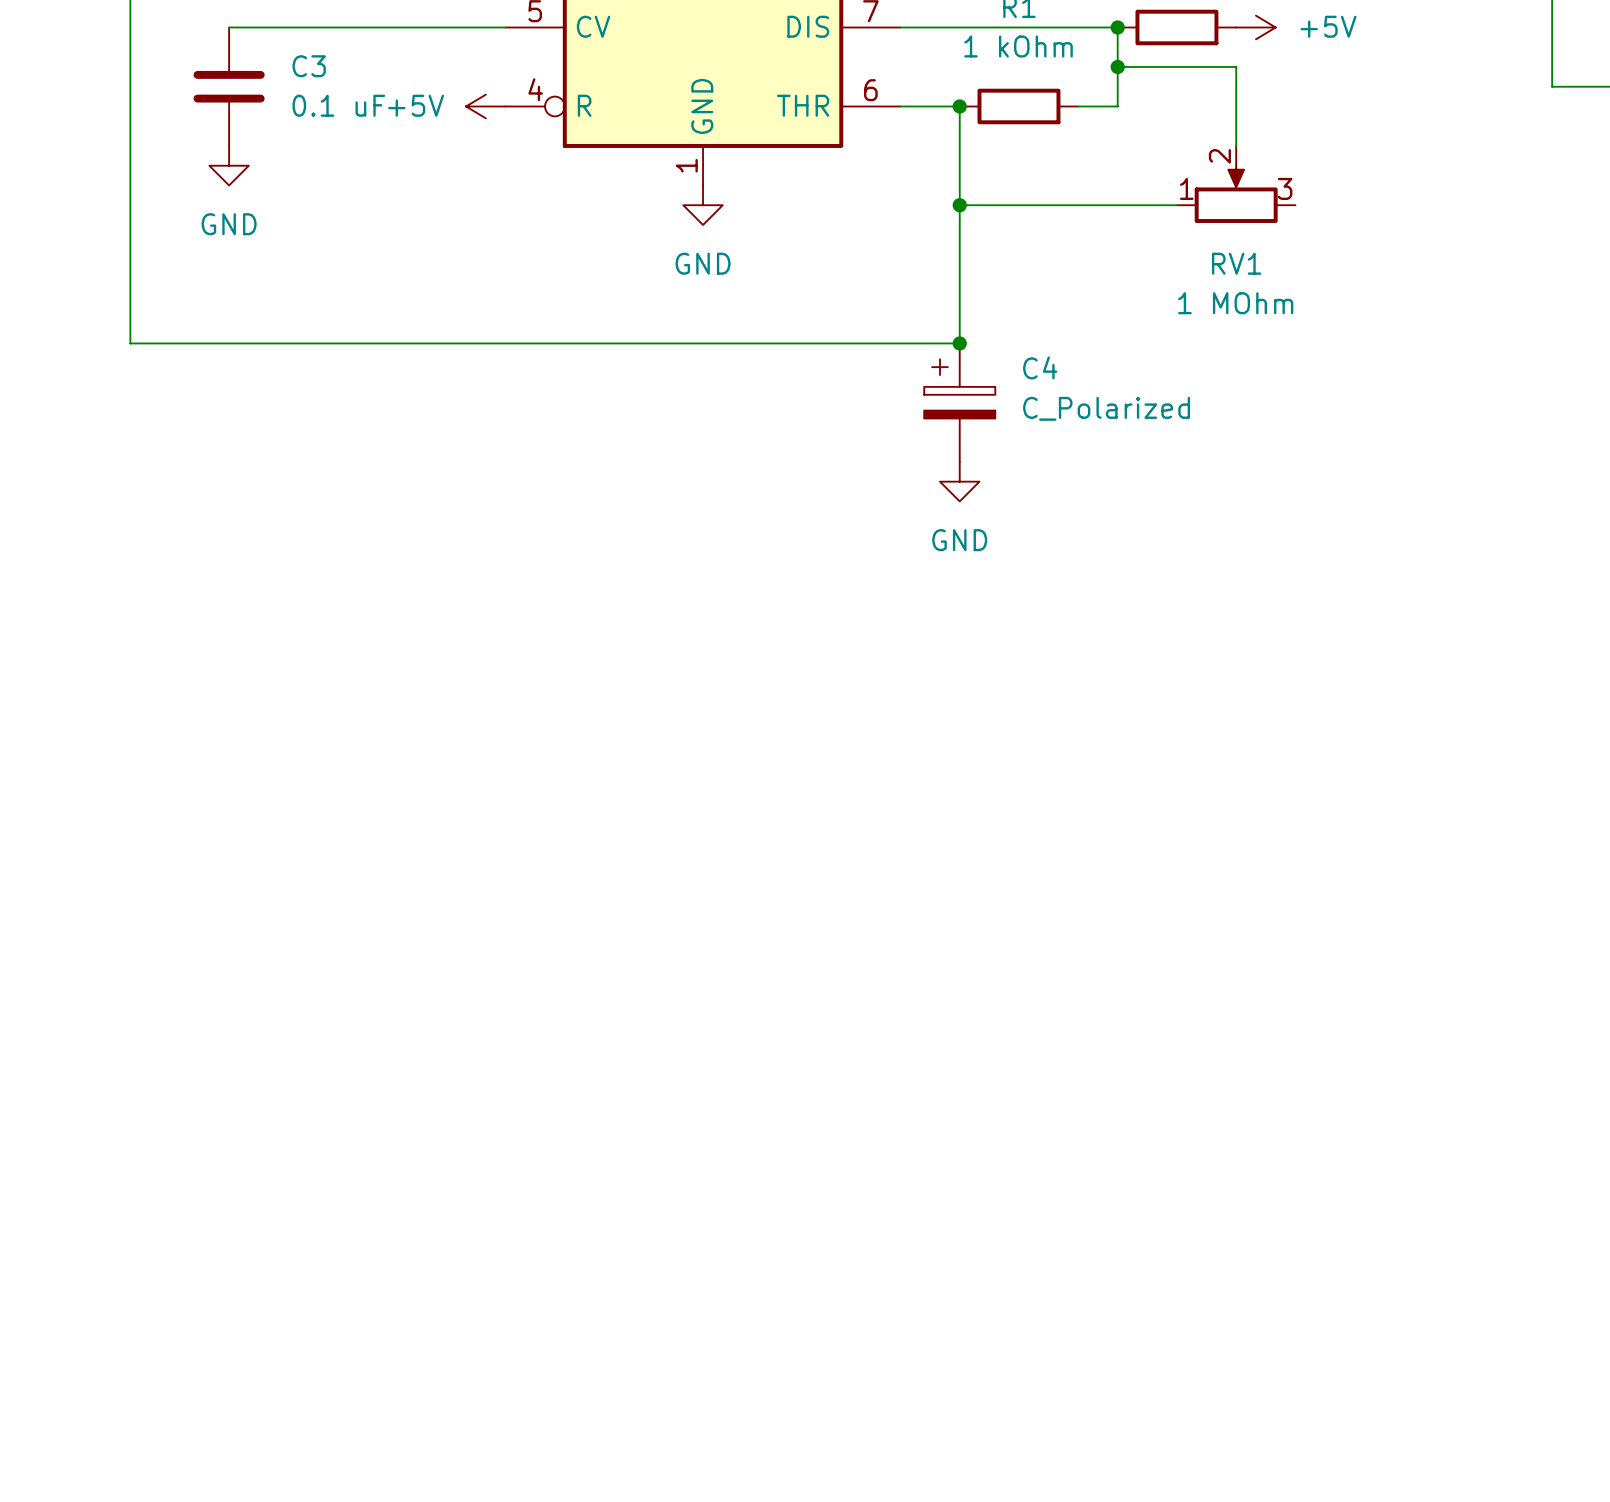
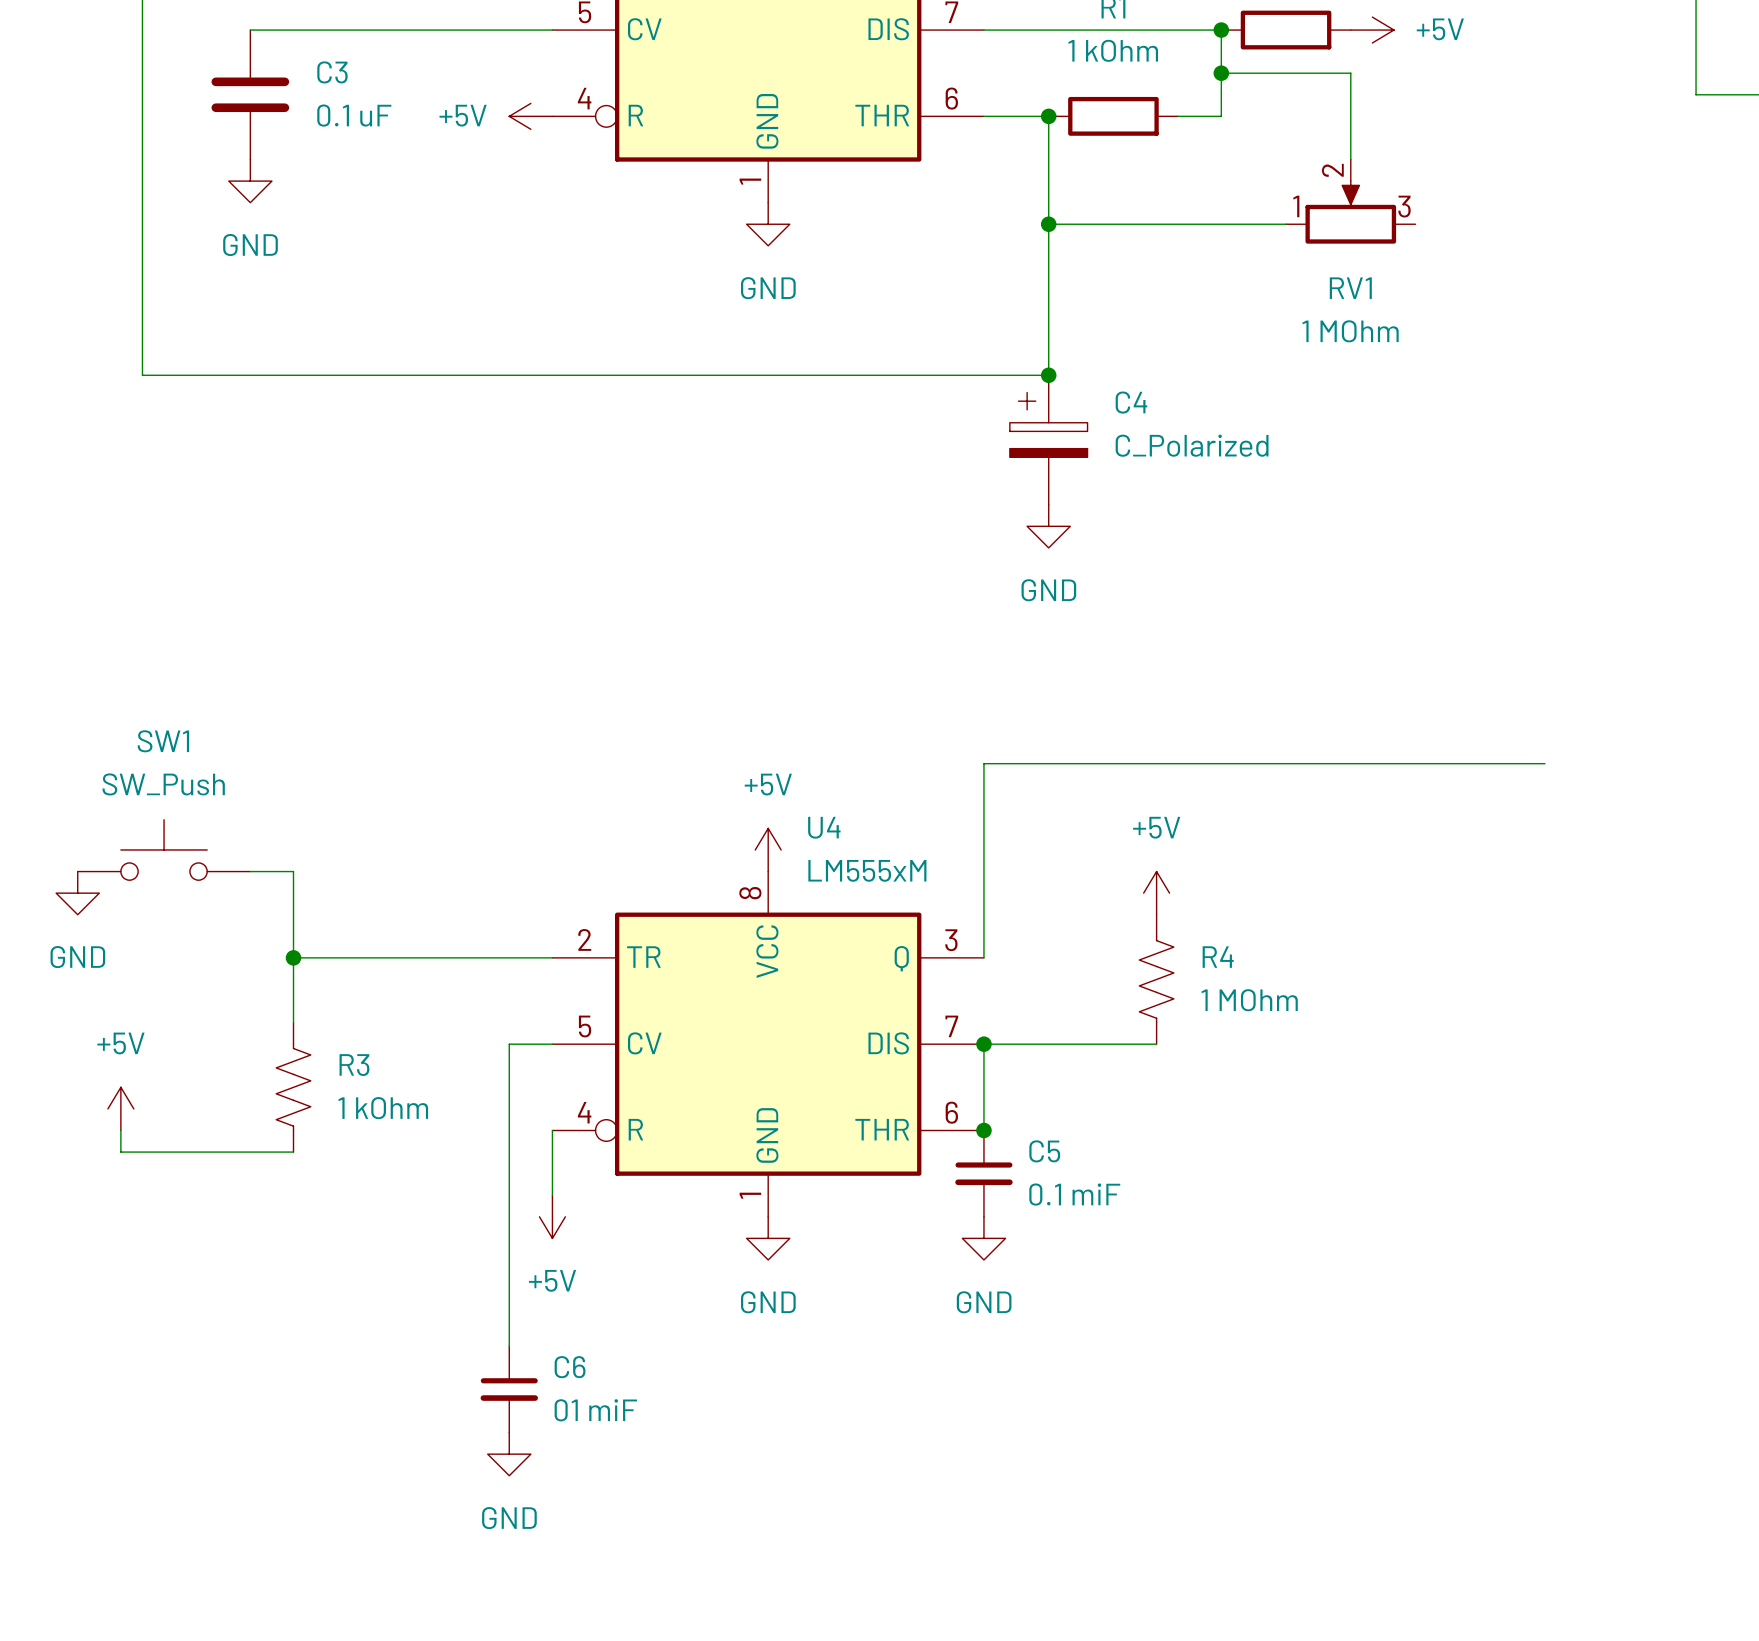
wire: none -> (1544, 763) (983, 763) (983, 957)
SW1: none -> SW_Push (164, 849)
power symbol: none -> +5V (768, 849)
wire: none -> (250, 871) (293, 871) (293, 1022)
power symbol: none -> GND (77, 893)
power symbol: none -> +5V (1156, 893)
wire: none -> (293, 957) (552, 957)
junction: none -> (293, 957)
R4: none -> 1 MOhm (1156, 979)
wire: none -> (552, 1044) (509, 1044) (509, 1346)
U4: none -> LM555xM (768, 1044)
junction: none -> (983, 1044)
wire: none -> (1156, 1044) (983, 1044) (983, 1130)
R3: none -> 1 kOhm (293, 1087)
power symbol: none -> +5V (120, 1108)
wire: none -> (120, 1130) (120, 1152) (293, 1152)
wire: none -> (552, 1130) (552, 1195)
junction: none -> (983, 1130)
C5: none -> 0.1 miF (983, 1173)
power symbol: none -> +5V (552, 1216)
power symbol: none -> GND (768, 1238)
power symbol: none -> GND (983, 1238)
C6: none -> 01 miF (509, 1389)
power symbol: none -> GND (509, 1454)

